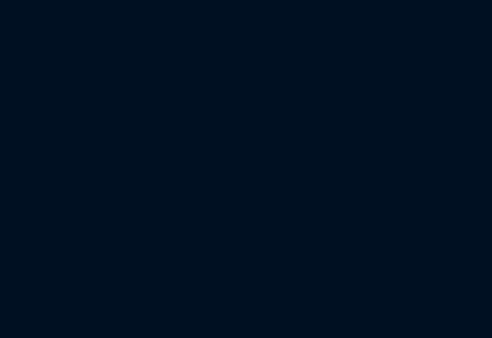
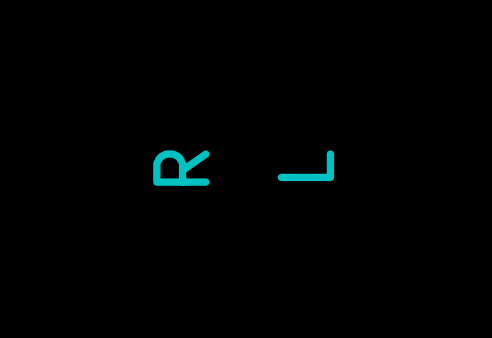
text: none -> L (305, 165)
text: none -> R (181, 168)

